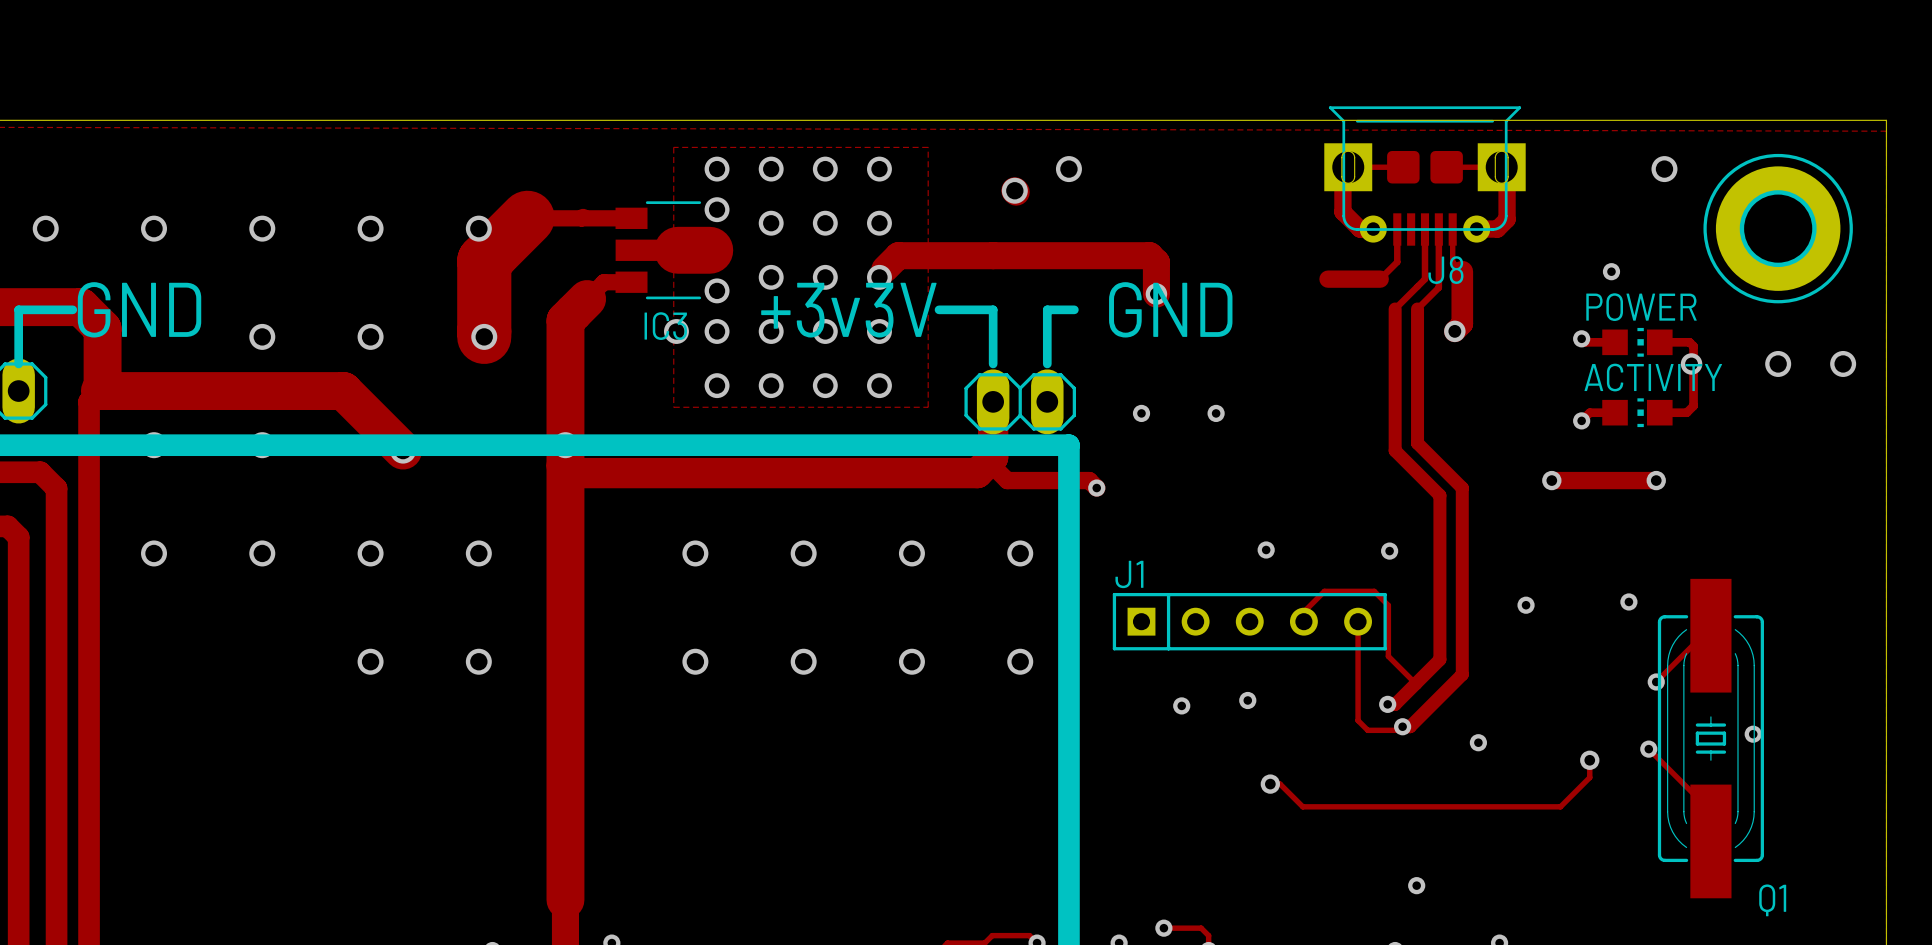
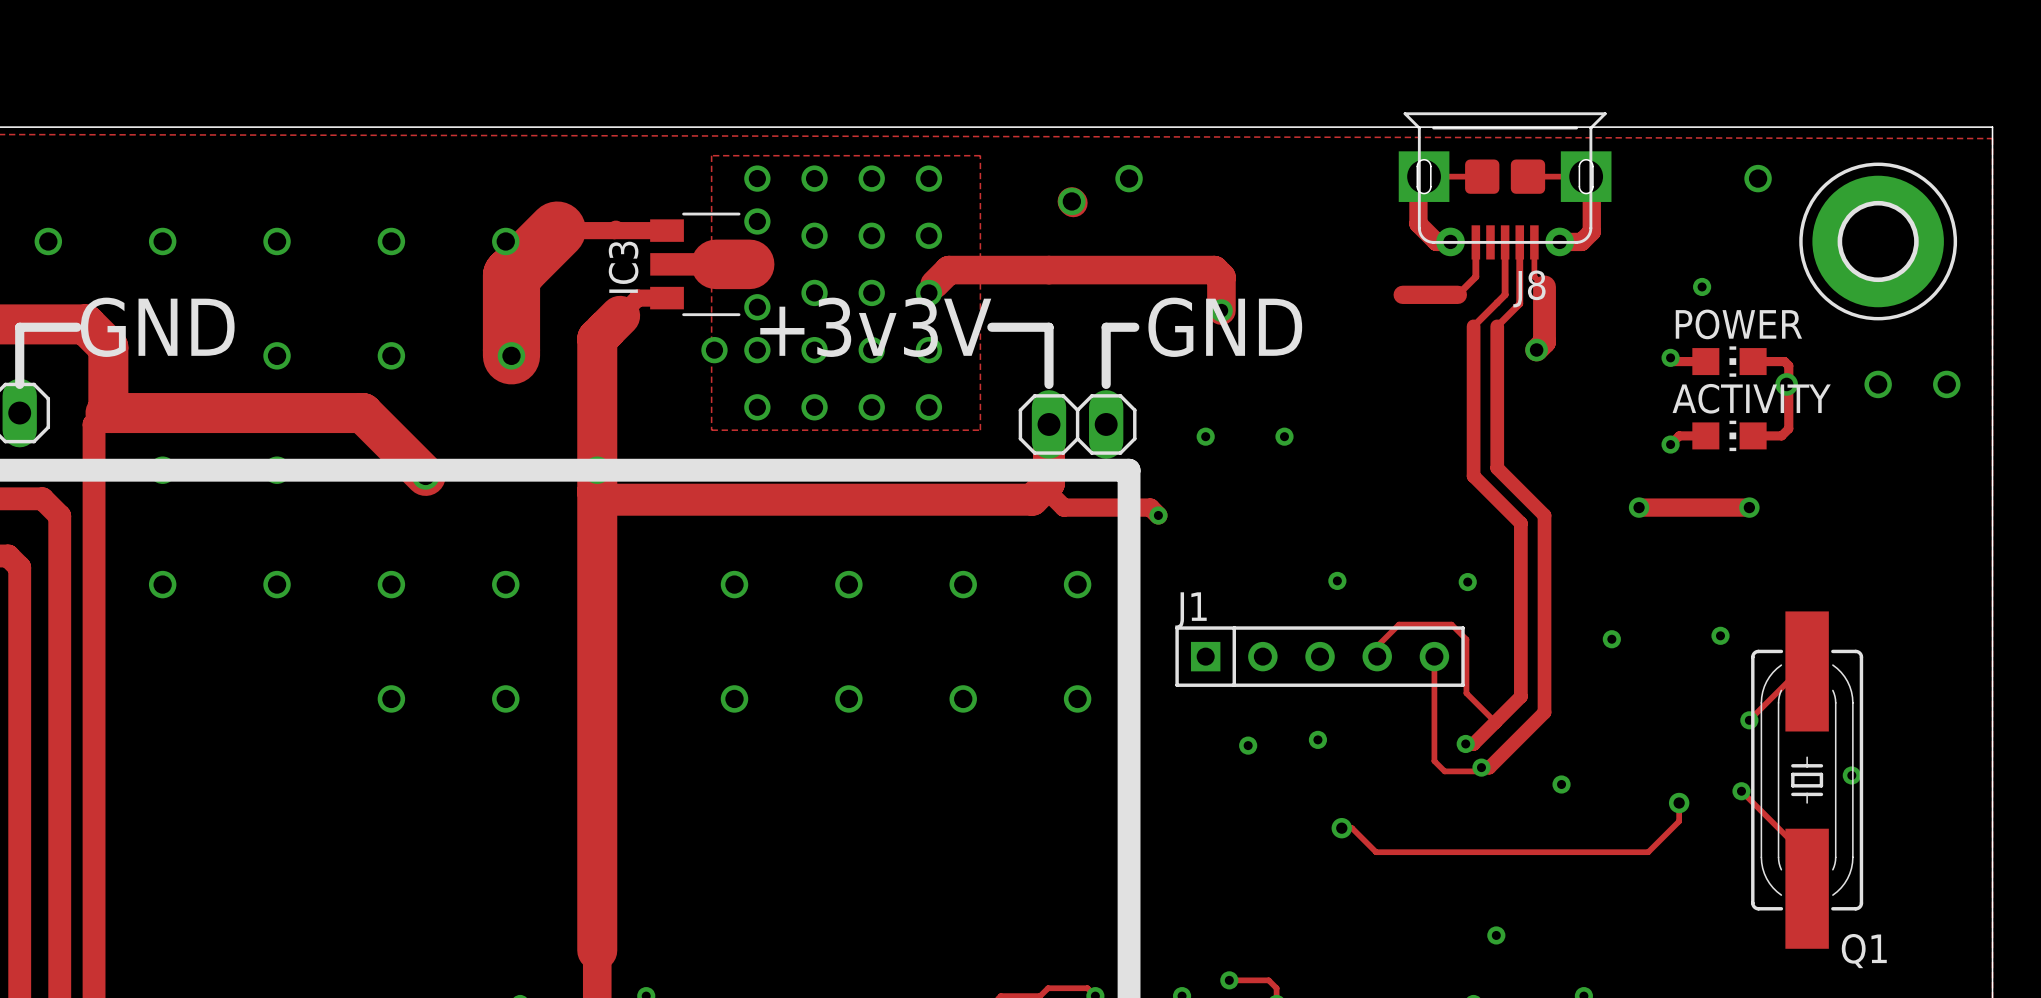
IC3 name rotation: 0° (665, 326) -> 90° counterclockwise (623, 267)
IC3 name position: IC3 (665, 326) -> IC3 (623, 267)

